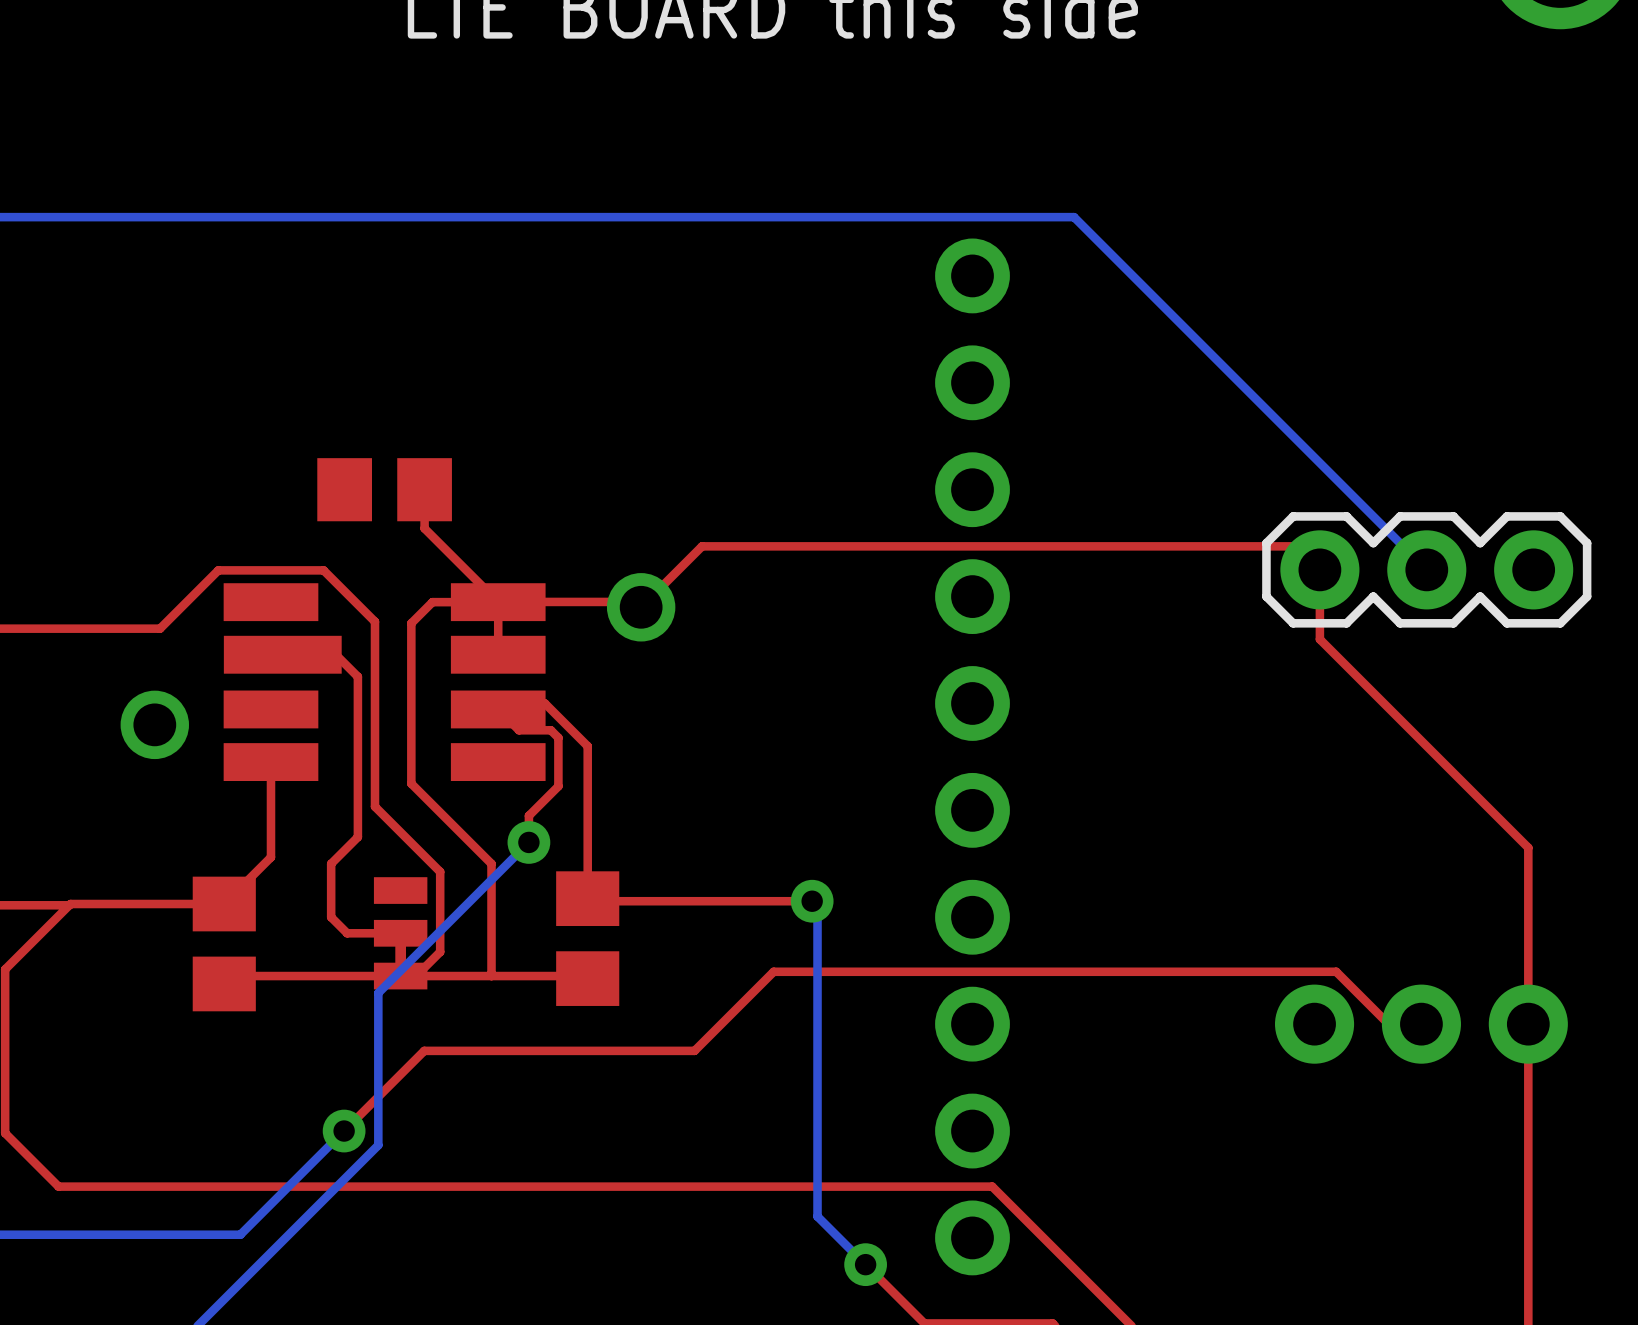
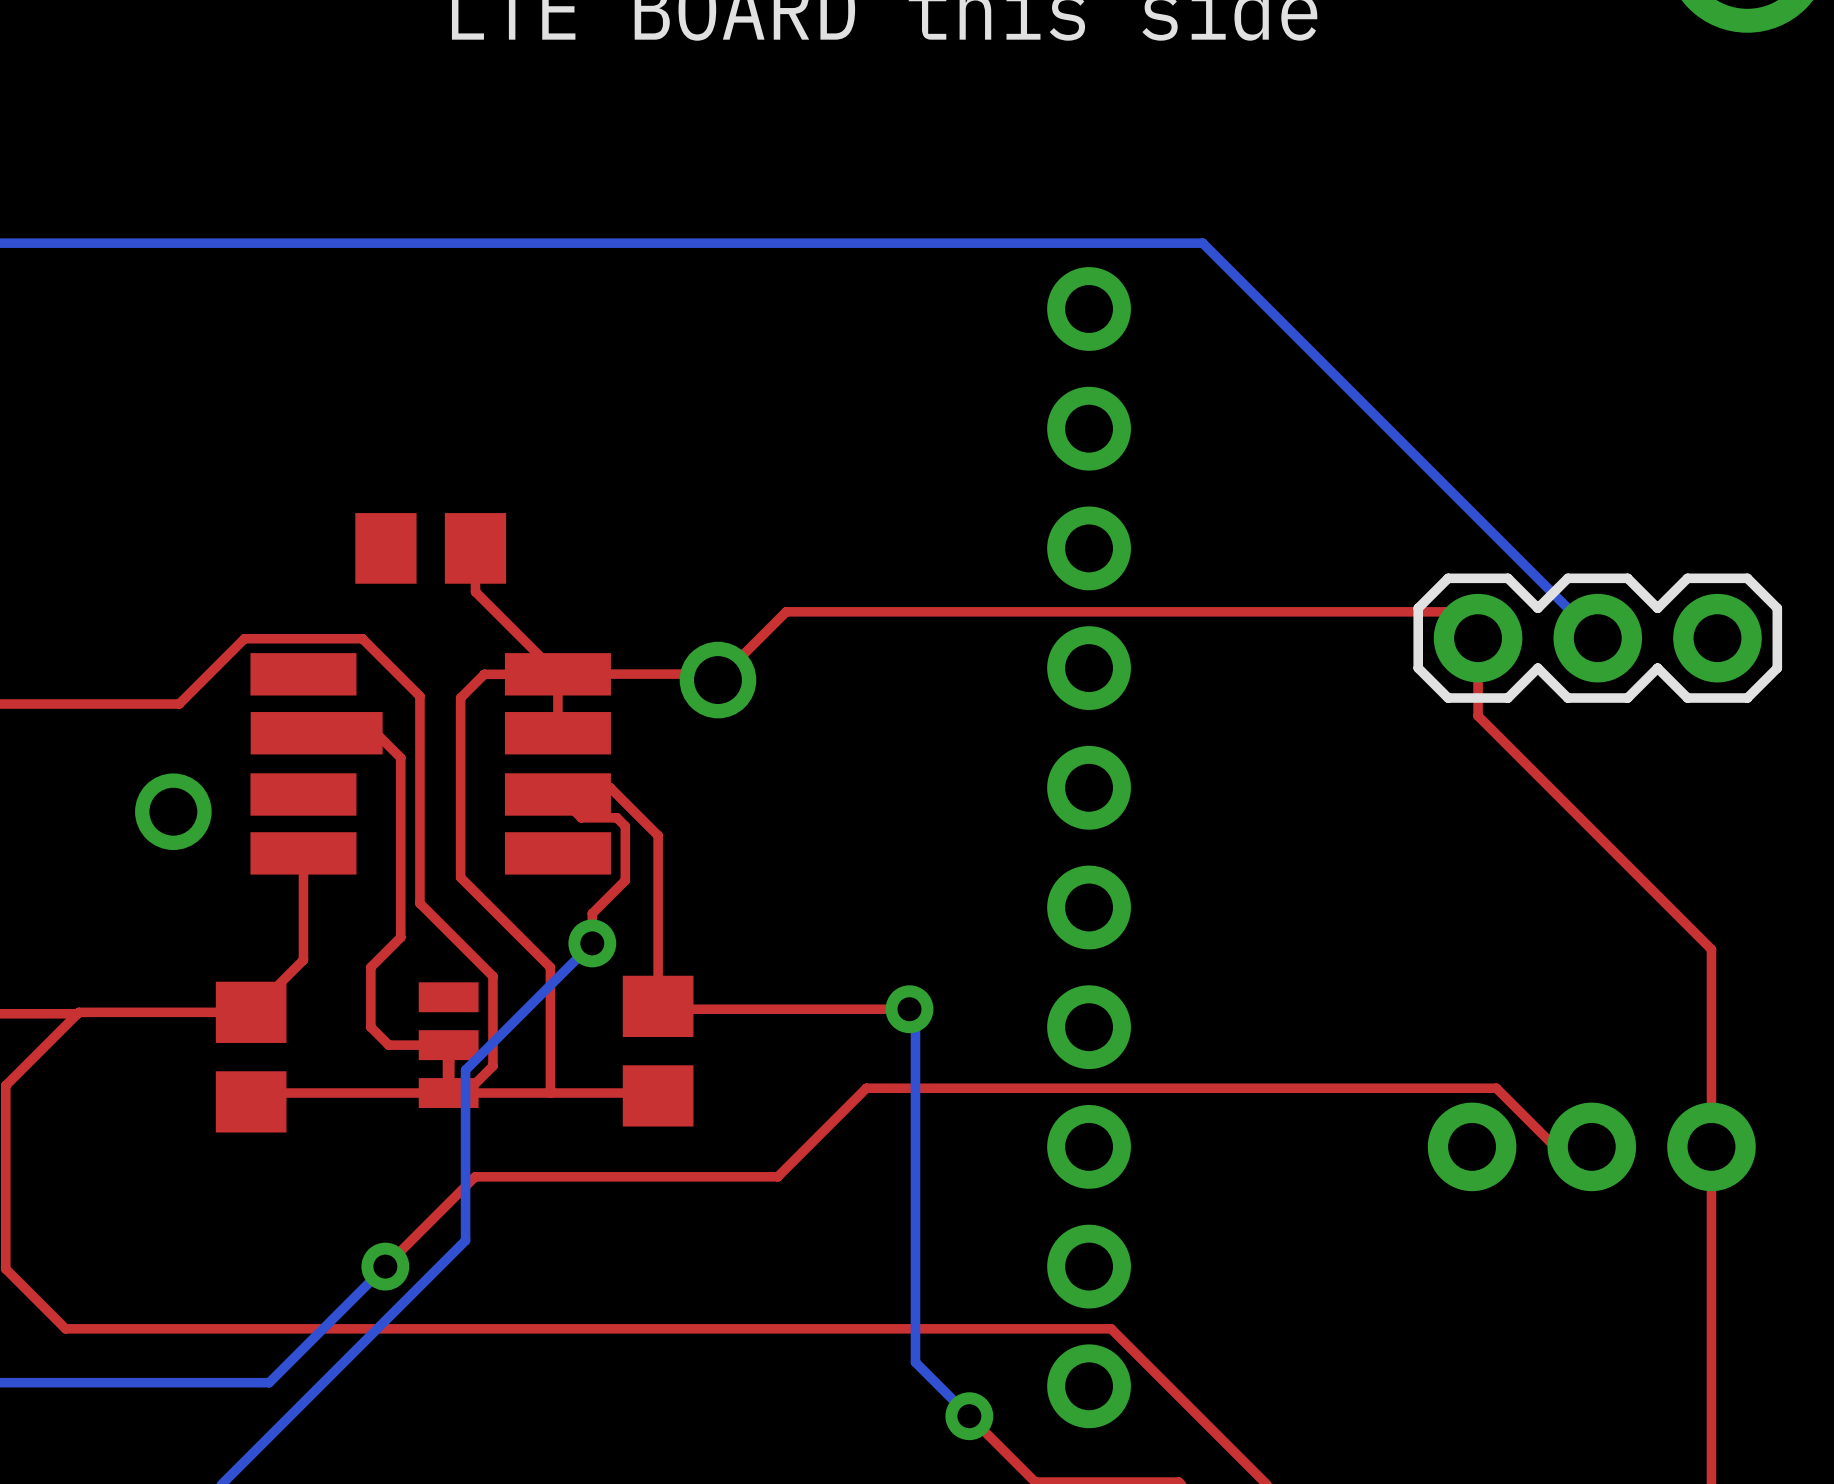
bottom track: (415, 955) (378, 993) (378, 1145) -> (465, 1070) (465, 1240) (423, 1282)

